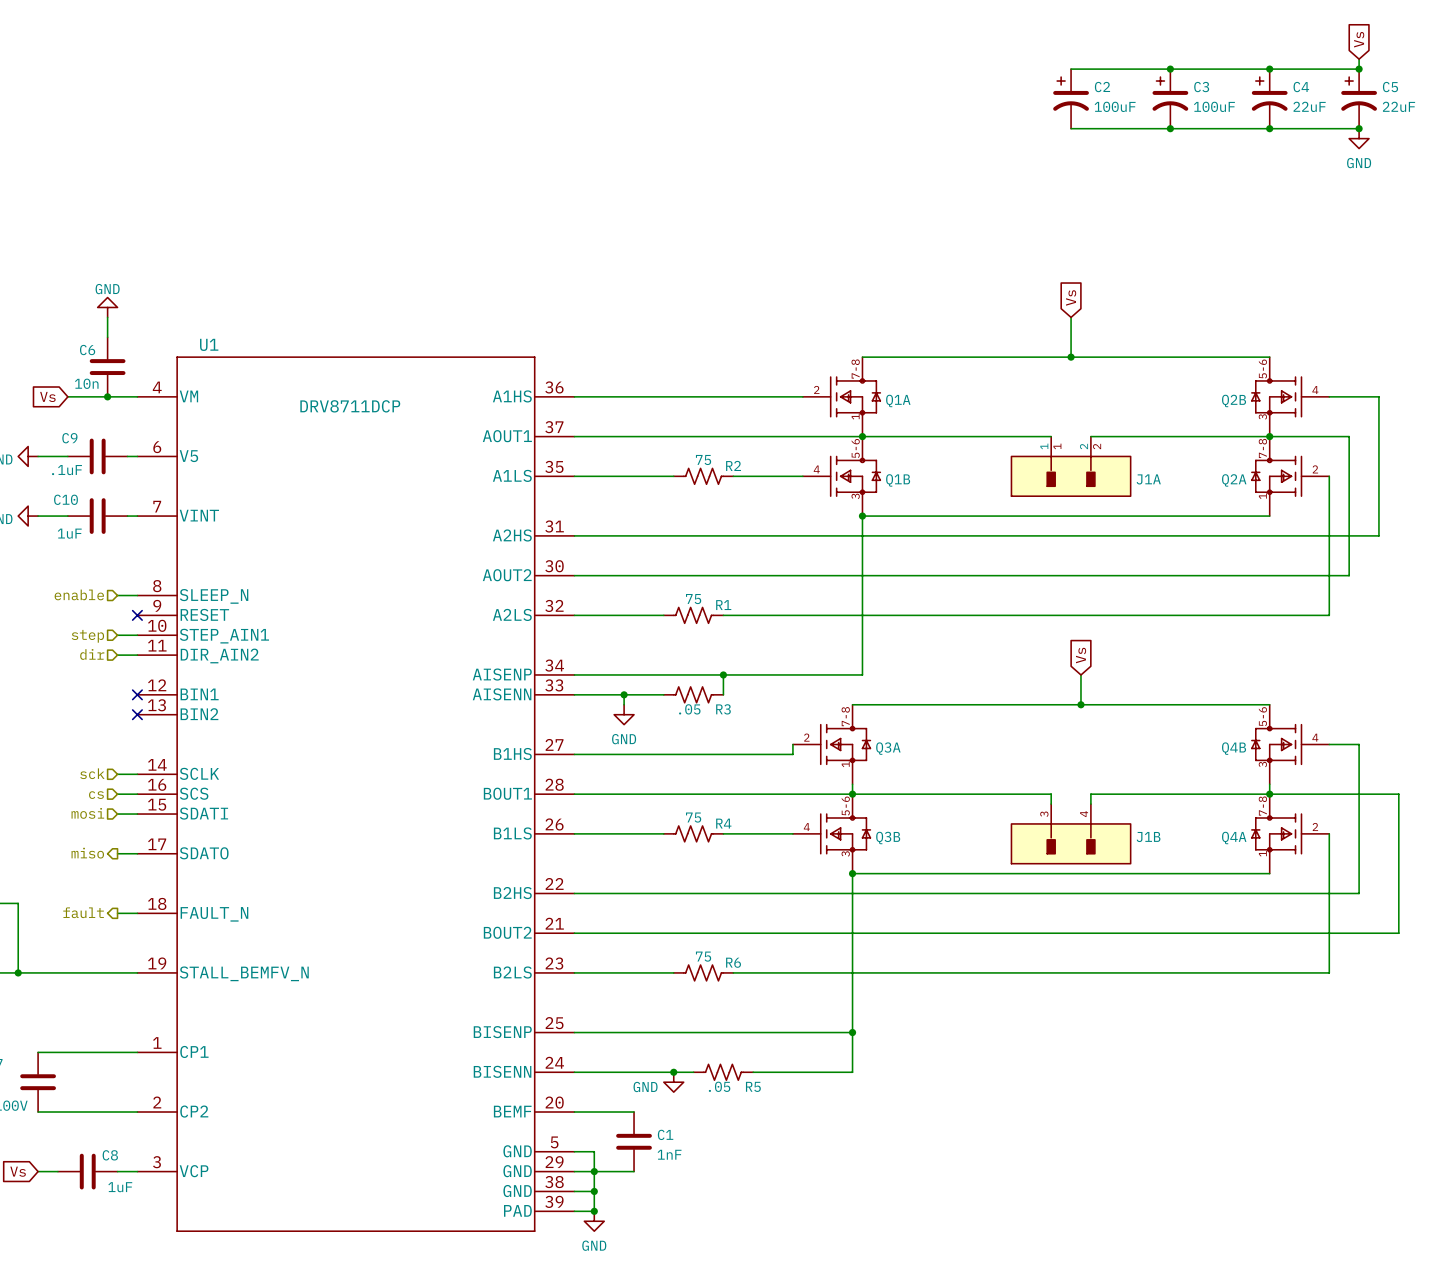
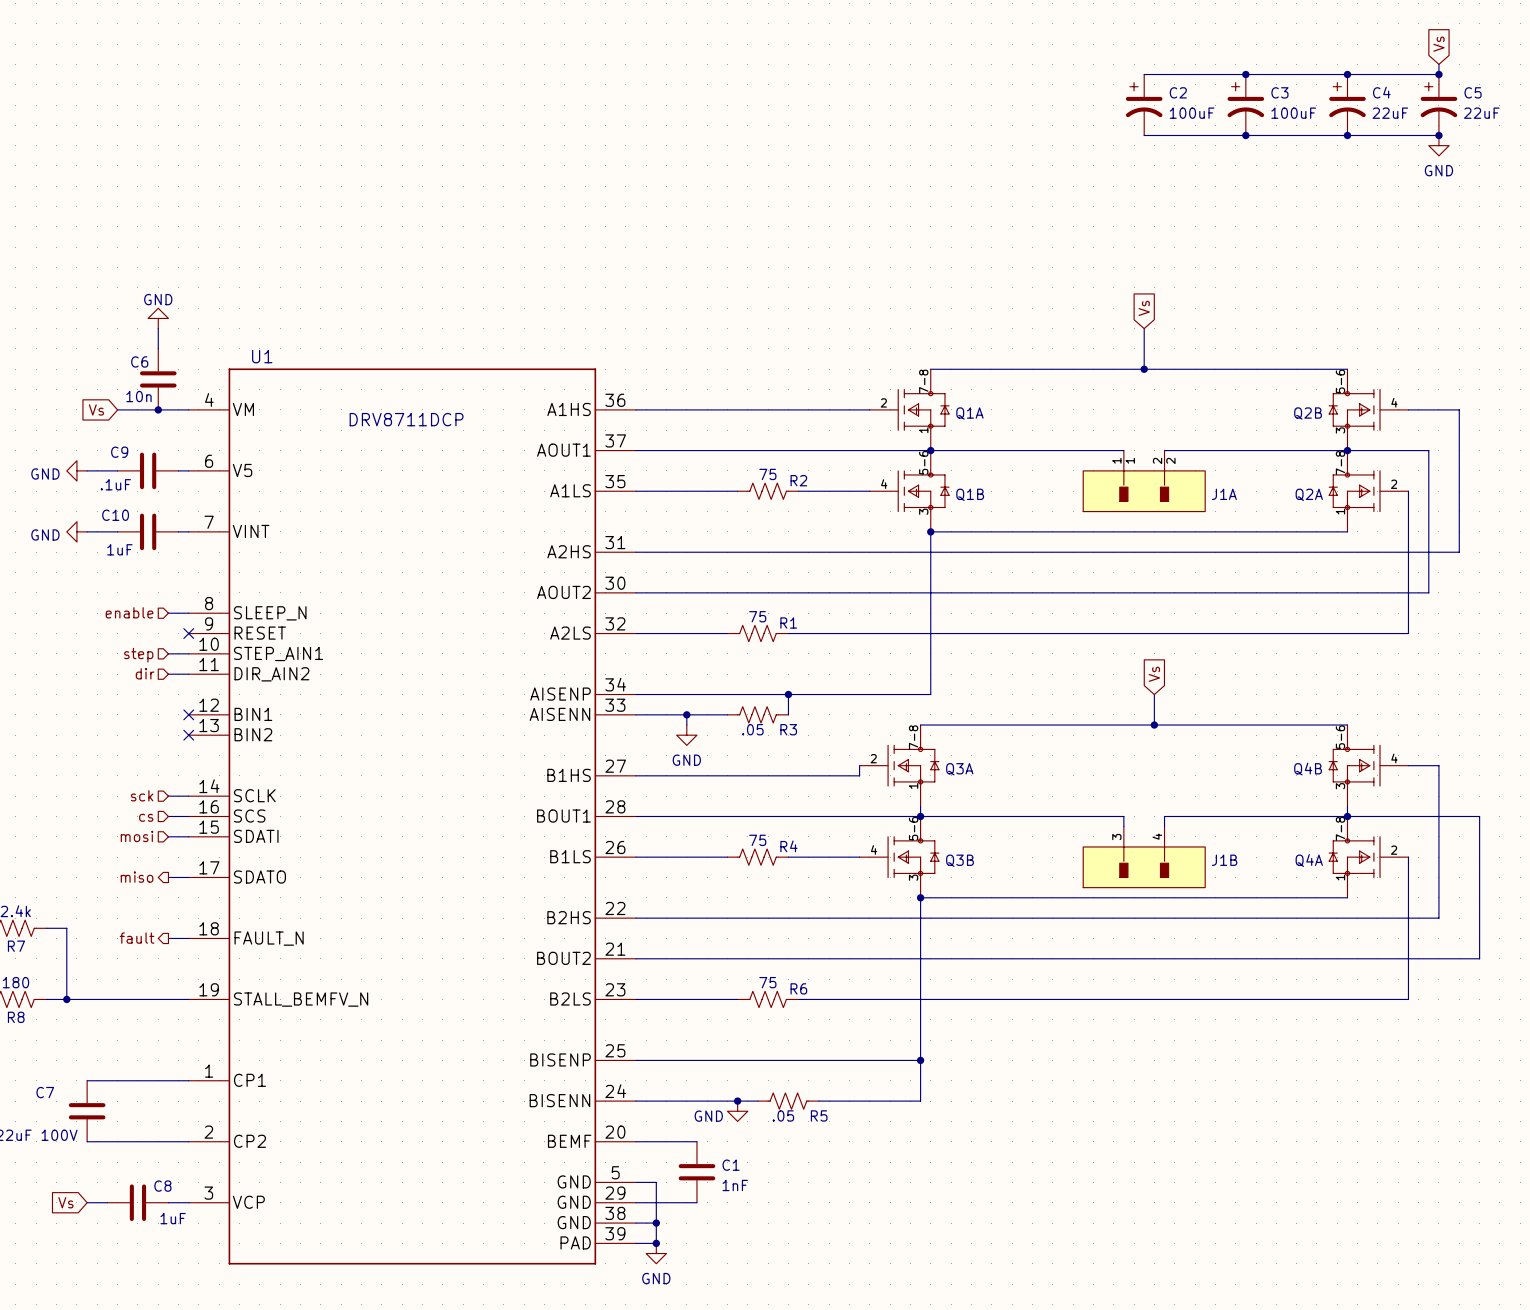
junction: (594, 1171) -> none

